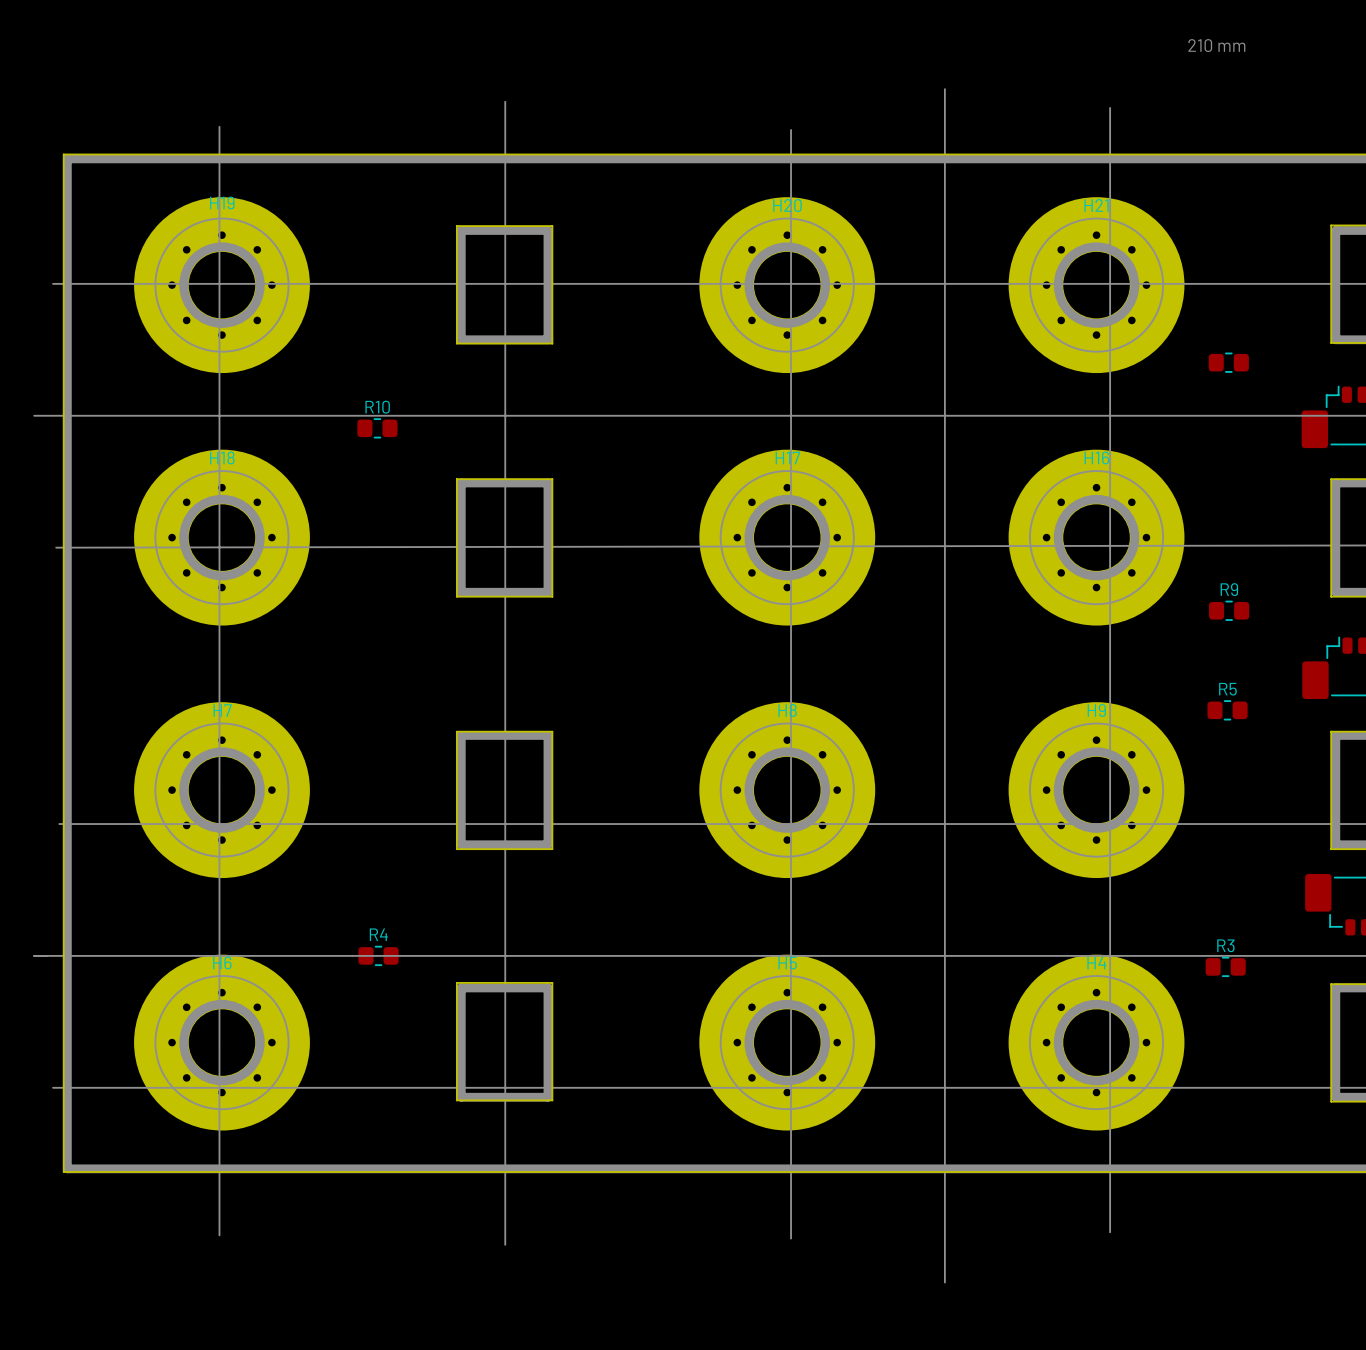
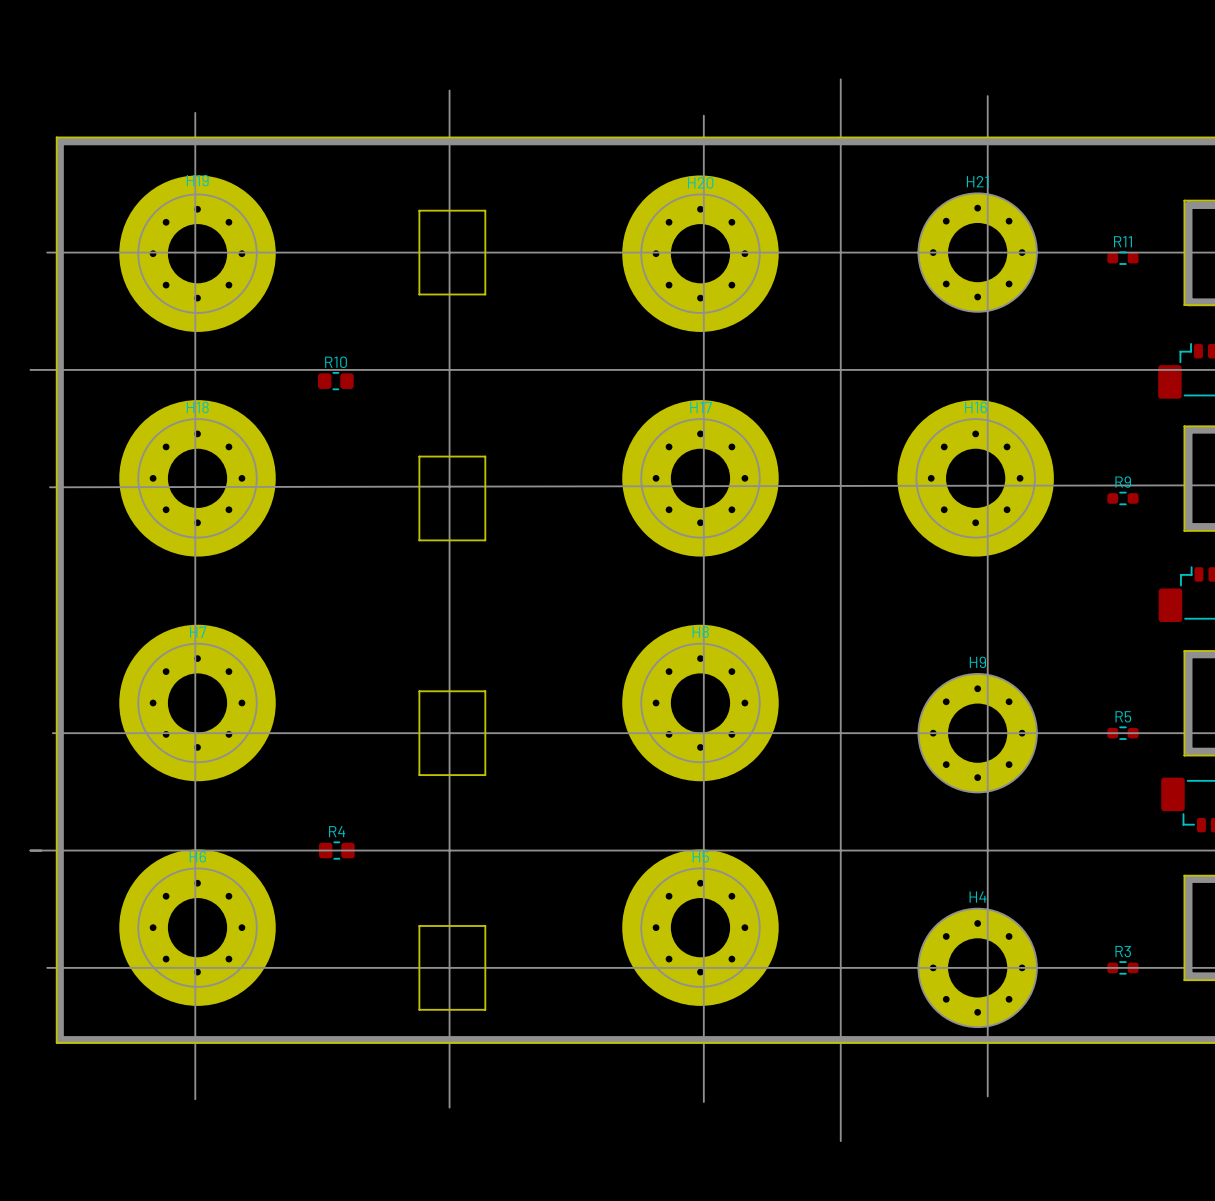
text: 210 mm (1216, 45) -> none
H21 footprint: [1008, 197, 1185, 374] -> [917, 192, 1038, 313]
board edge: (456, 226) (456, 343) (552, 343) (552, 226) (456, 226) -> (419, 210) (419, 294) (485, 294) (485, 210) (419, 210)
line: (461, 230) (461, 339) (547, 339) (547, 230) (461, 230) -> none
drawing: [179, 242, 265, 328] -> none
drawing: [744, 242, 830, 328] -> none
drawing: [1053, 242, 1140, 328] -> none
R11: none -> (1122, 258)
part: (1228, 362) -> none
board edge: (456, 479) (552, 479) (552, 596) (456, 596) (456, 479) -> (419, 456) (419, 540) (485, 540) (485, 456) (419, 456)
line: (461, 482) (461, 592) (547, 592) (547, 482) (461, 482) -> none
drawing: [179, 494, 265, 581] -> none
drawing: [744, 494, 830, 581] -> none
drawing: [1053, 494, 1140, 581] -> none
R9 footprint: [1209, 600, 1250, 621] -> [1107, 491, 1139, 505]
R5 footprint: [1207, 700, 1248, 721] -> [1107, 726, 1139, 740]
H9 footprint: [1008, 702, 1185, 879] -> [917, 673, 1038, 794]
board edge: (456, 731) (456, 849) (552, 849) (552, 731) (456, 731) -> none
line: (461, 735) (461, 844) (547, 844) (547, 735) (461, 735) -> none
drawing: [179, 747, 265, 833] -> none
drawing: [744, 747, 830, 833] -> none
drawing: [1053, 747, 1140, 833] -> none
board edge: none -> (419, 691) (485, 691) (485, 775) (419, 775) (419, 691)
H4 footprint: [1008, 954, 1185, 1131] -> [917, 907, 1038, 1028]
R3 footprint: [1205, 956, 1246, 977] -> [1107, 961, 1139, 975]
board edge: (456, 982) (456, 1100) (552, 1100) (552, 982) (456, 982) -> none
line: (461, 987) (547, 987) (547, 1097) (461, 1097) (461, 987) -> none
drawing: [179, 999, 265, 1086] -> none
drawing: [744, 999, 830, 1086] -> none
drawing: [1053, 999, 1140, 1086] -> none
board edge: none -> (419, 925) (485, 925) (485, 1009) (419, 1009) (419, 925)

